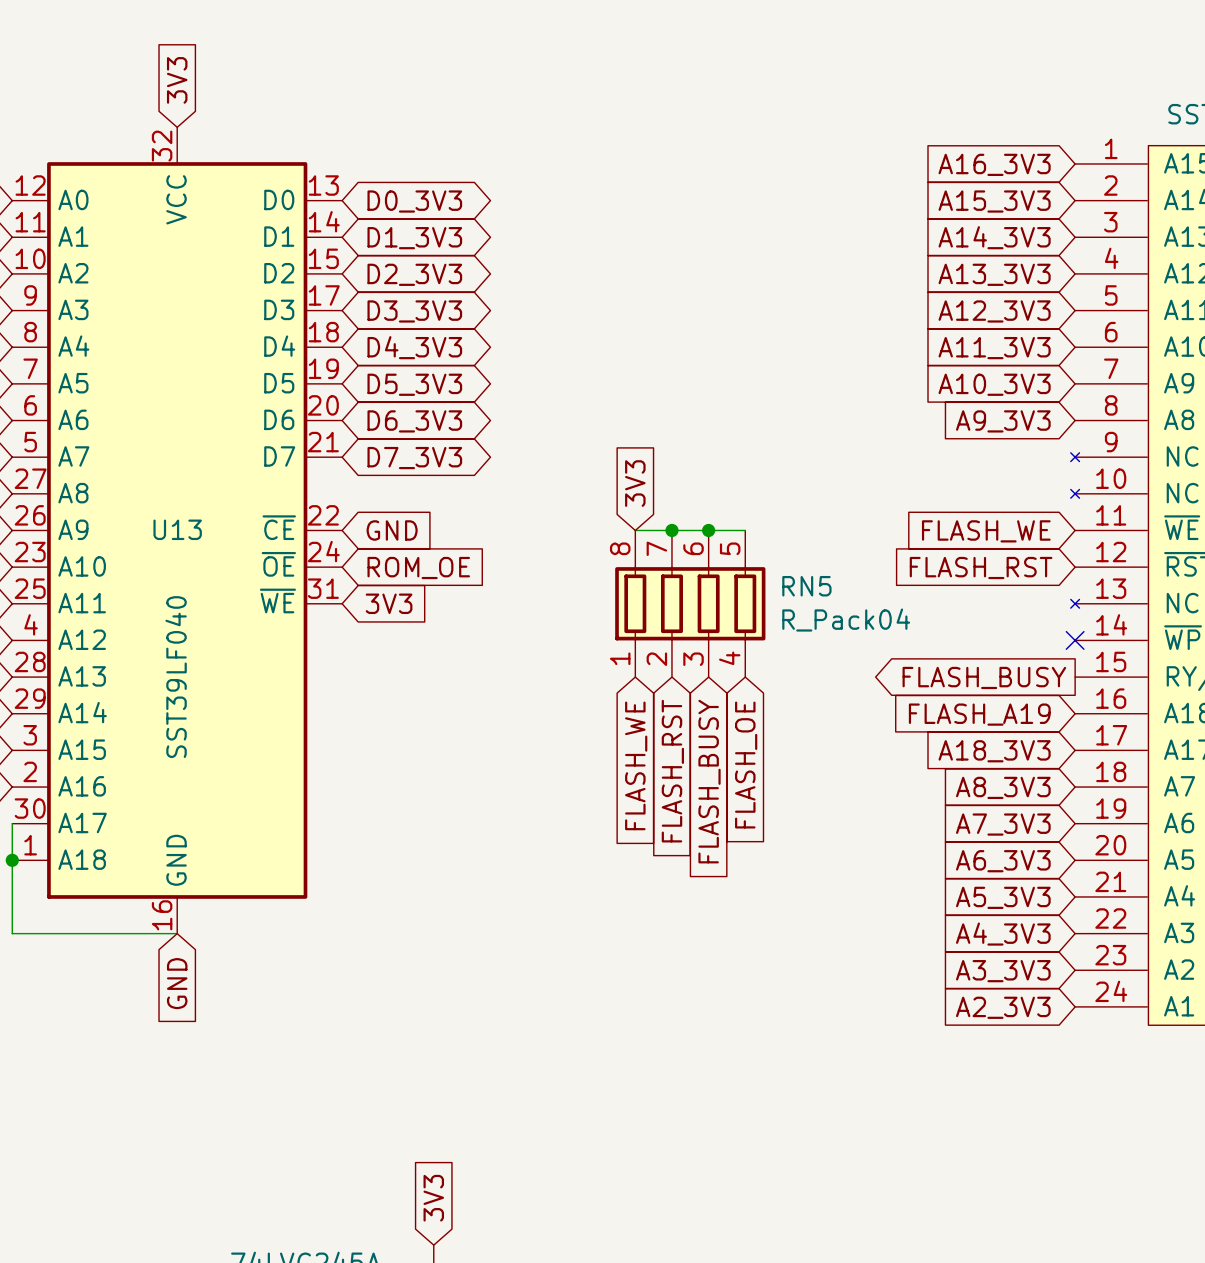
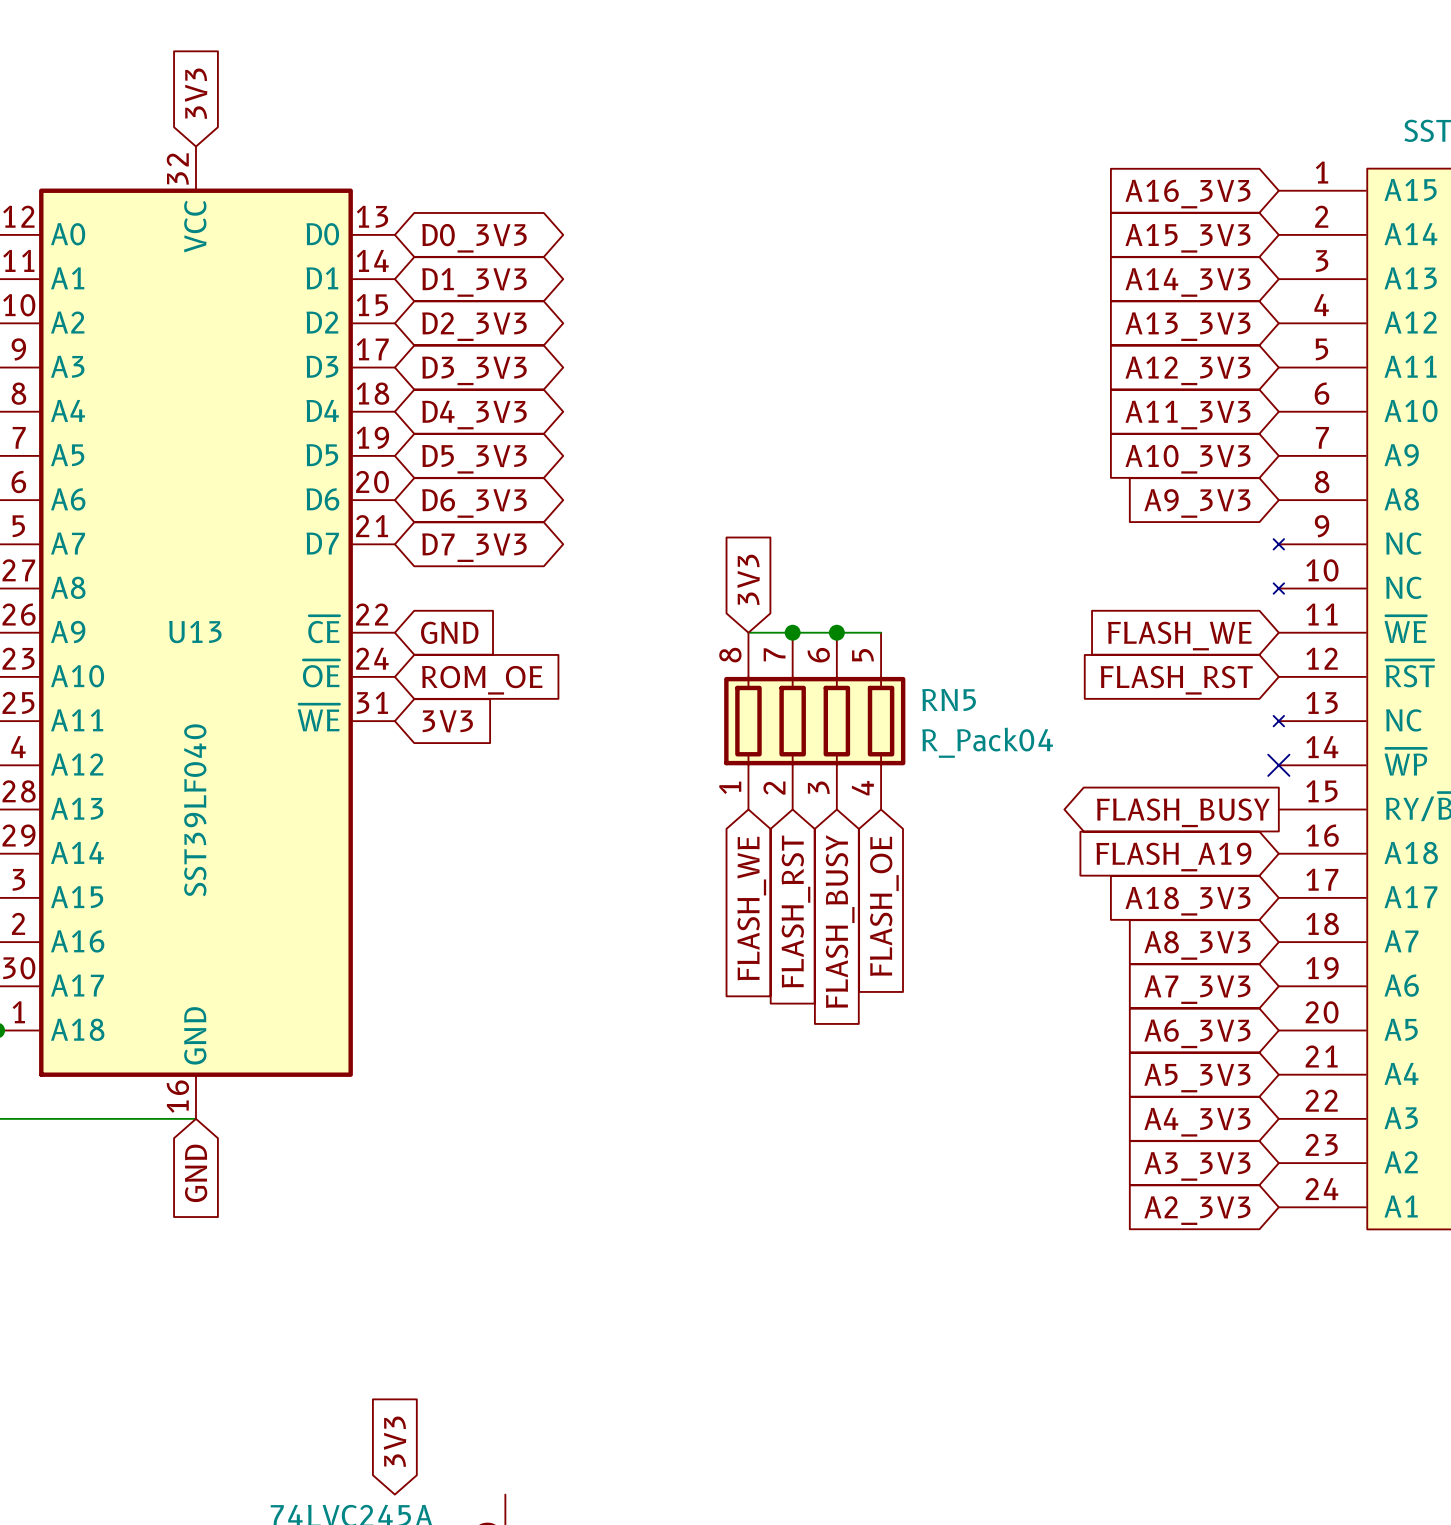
global label position: 3V3 (433, 1198) -> 3V3 (395, 1441)

